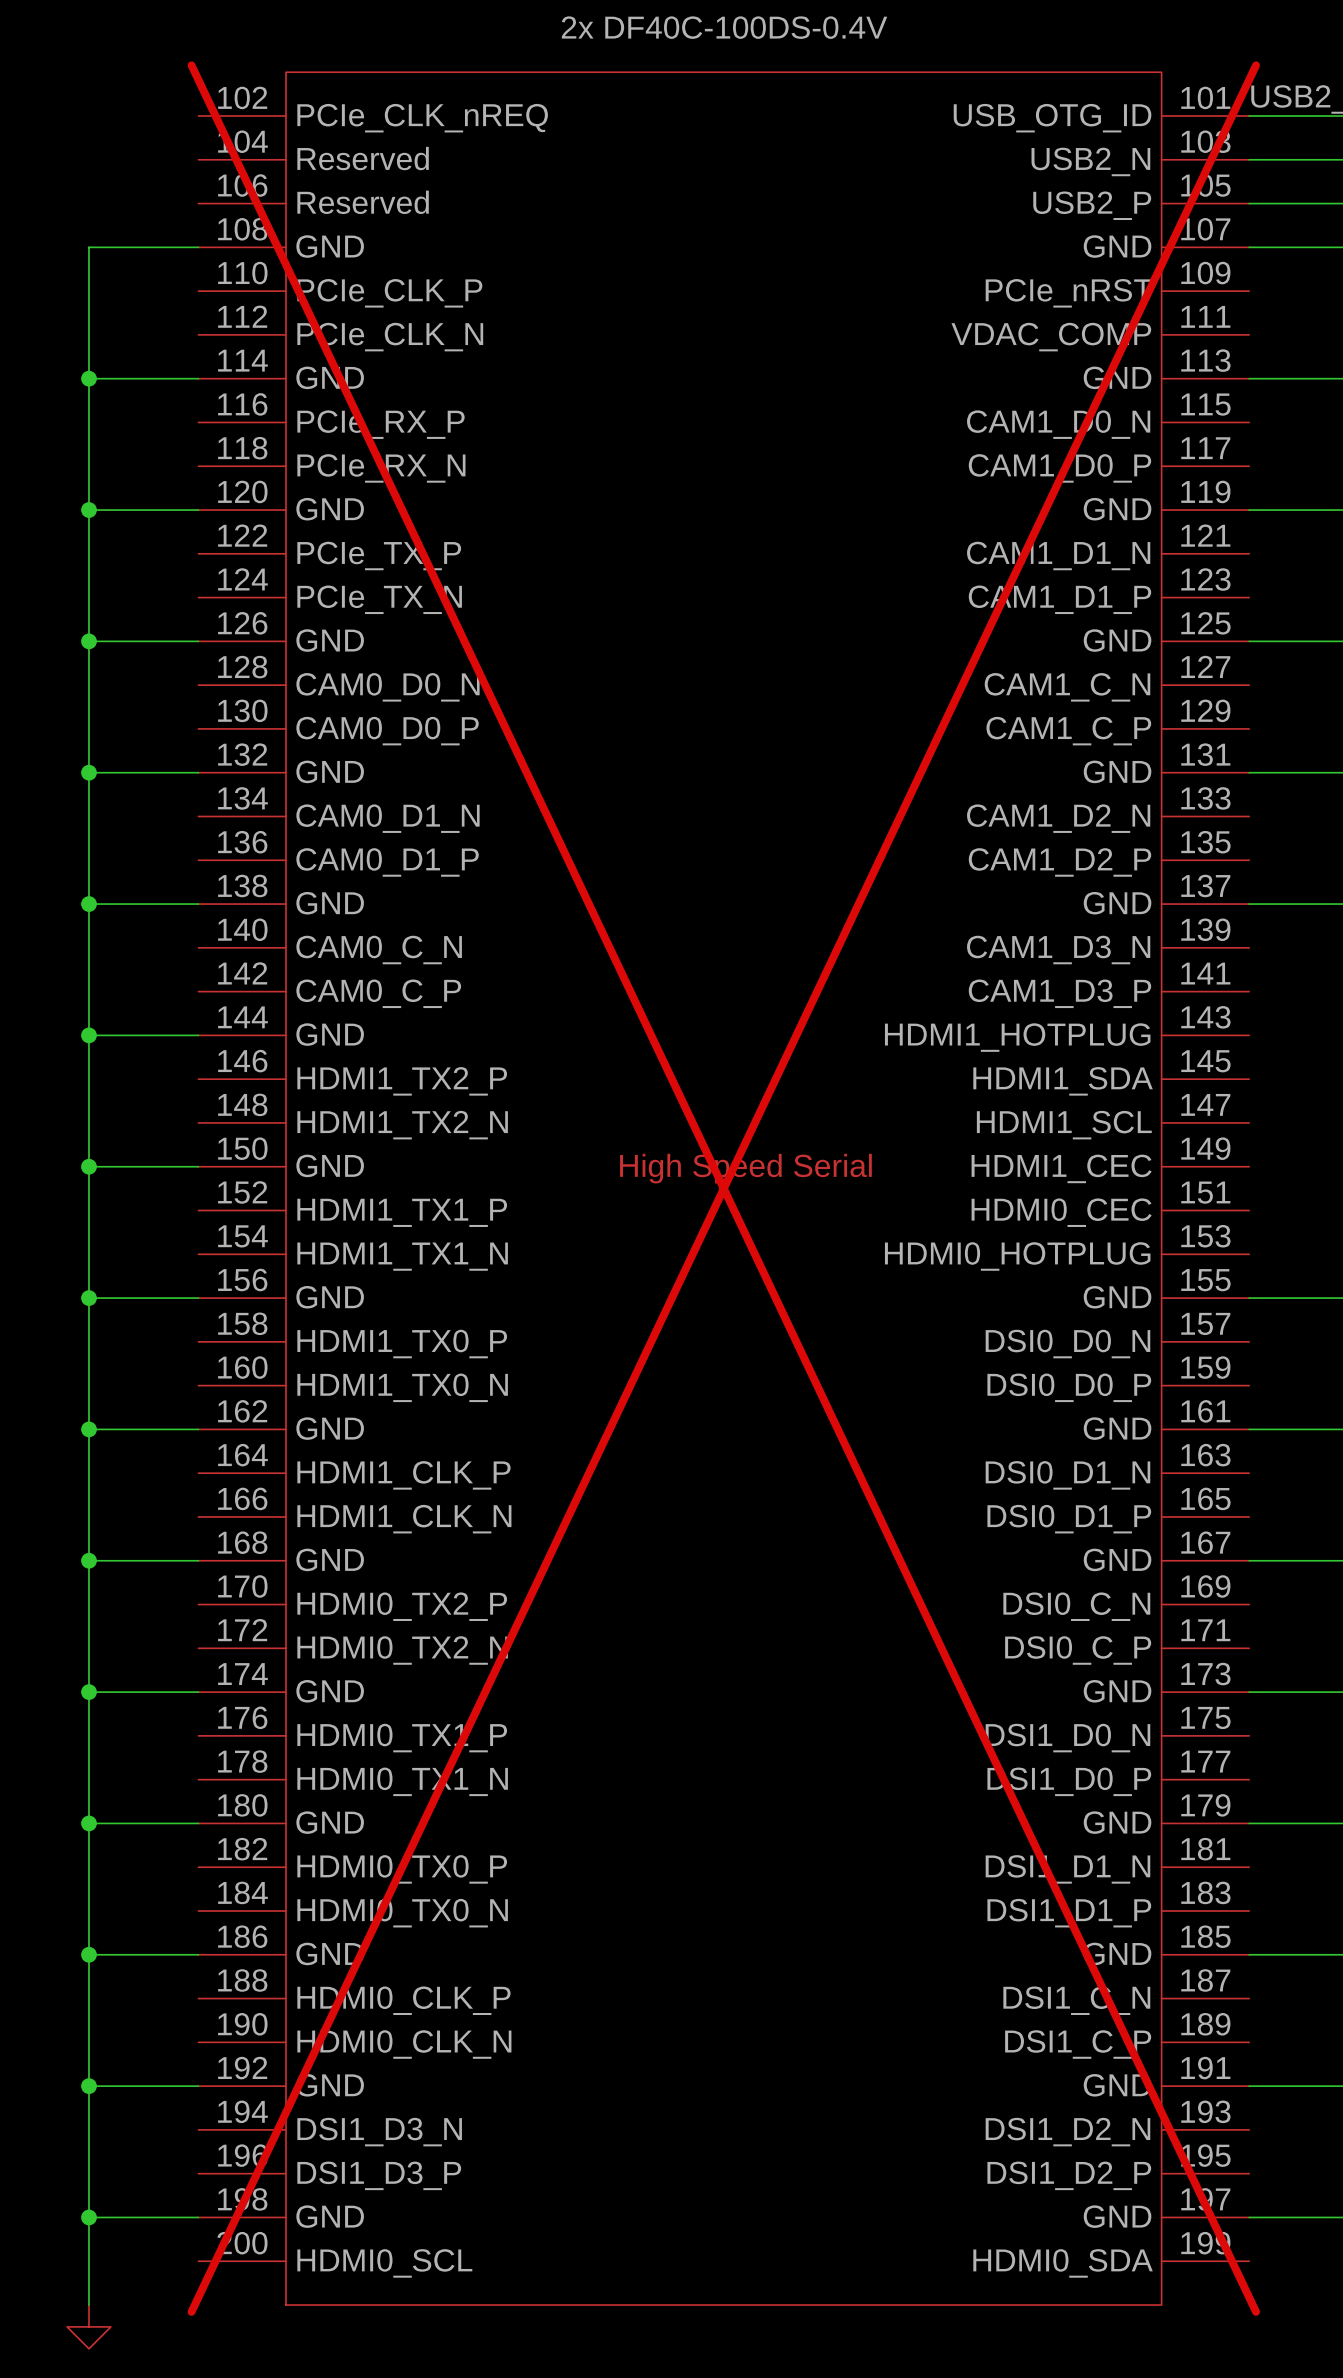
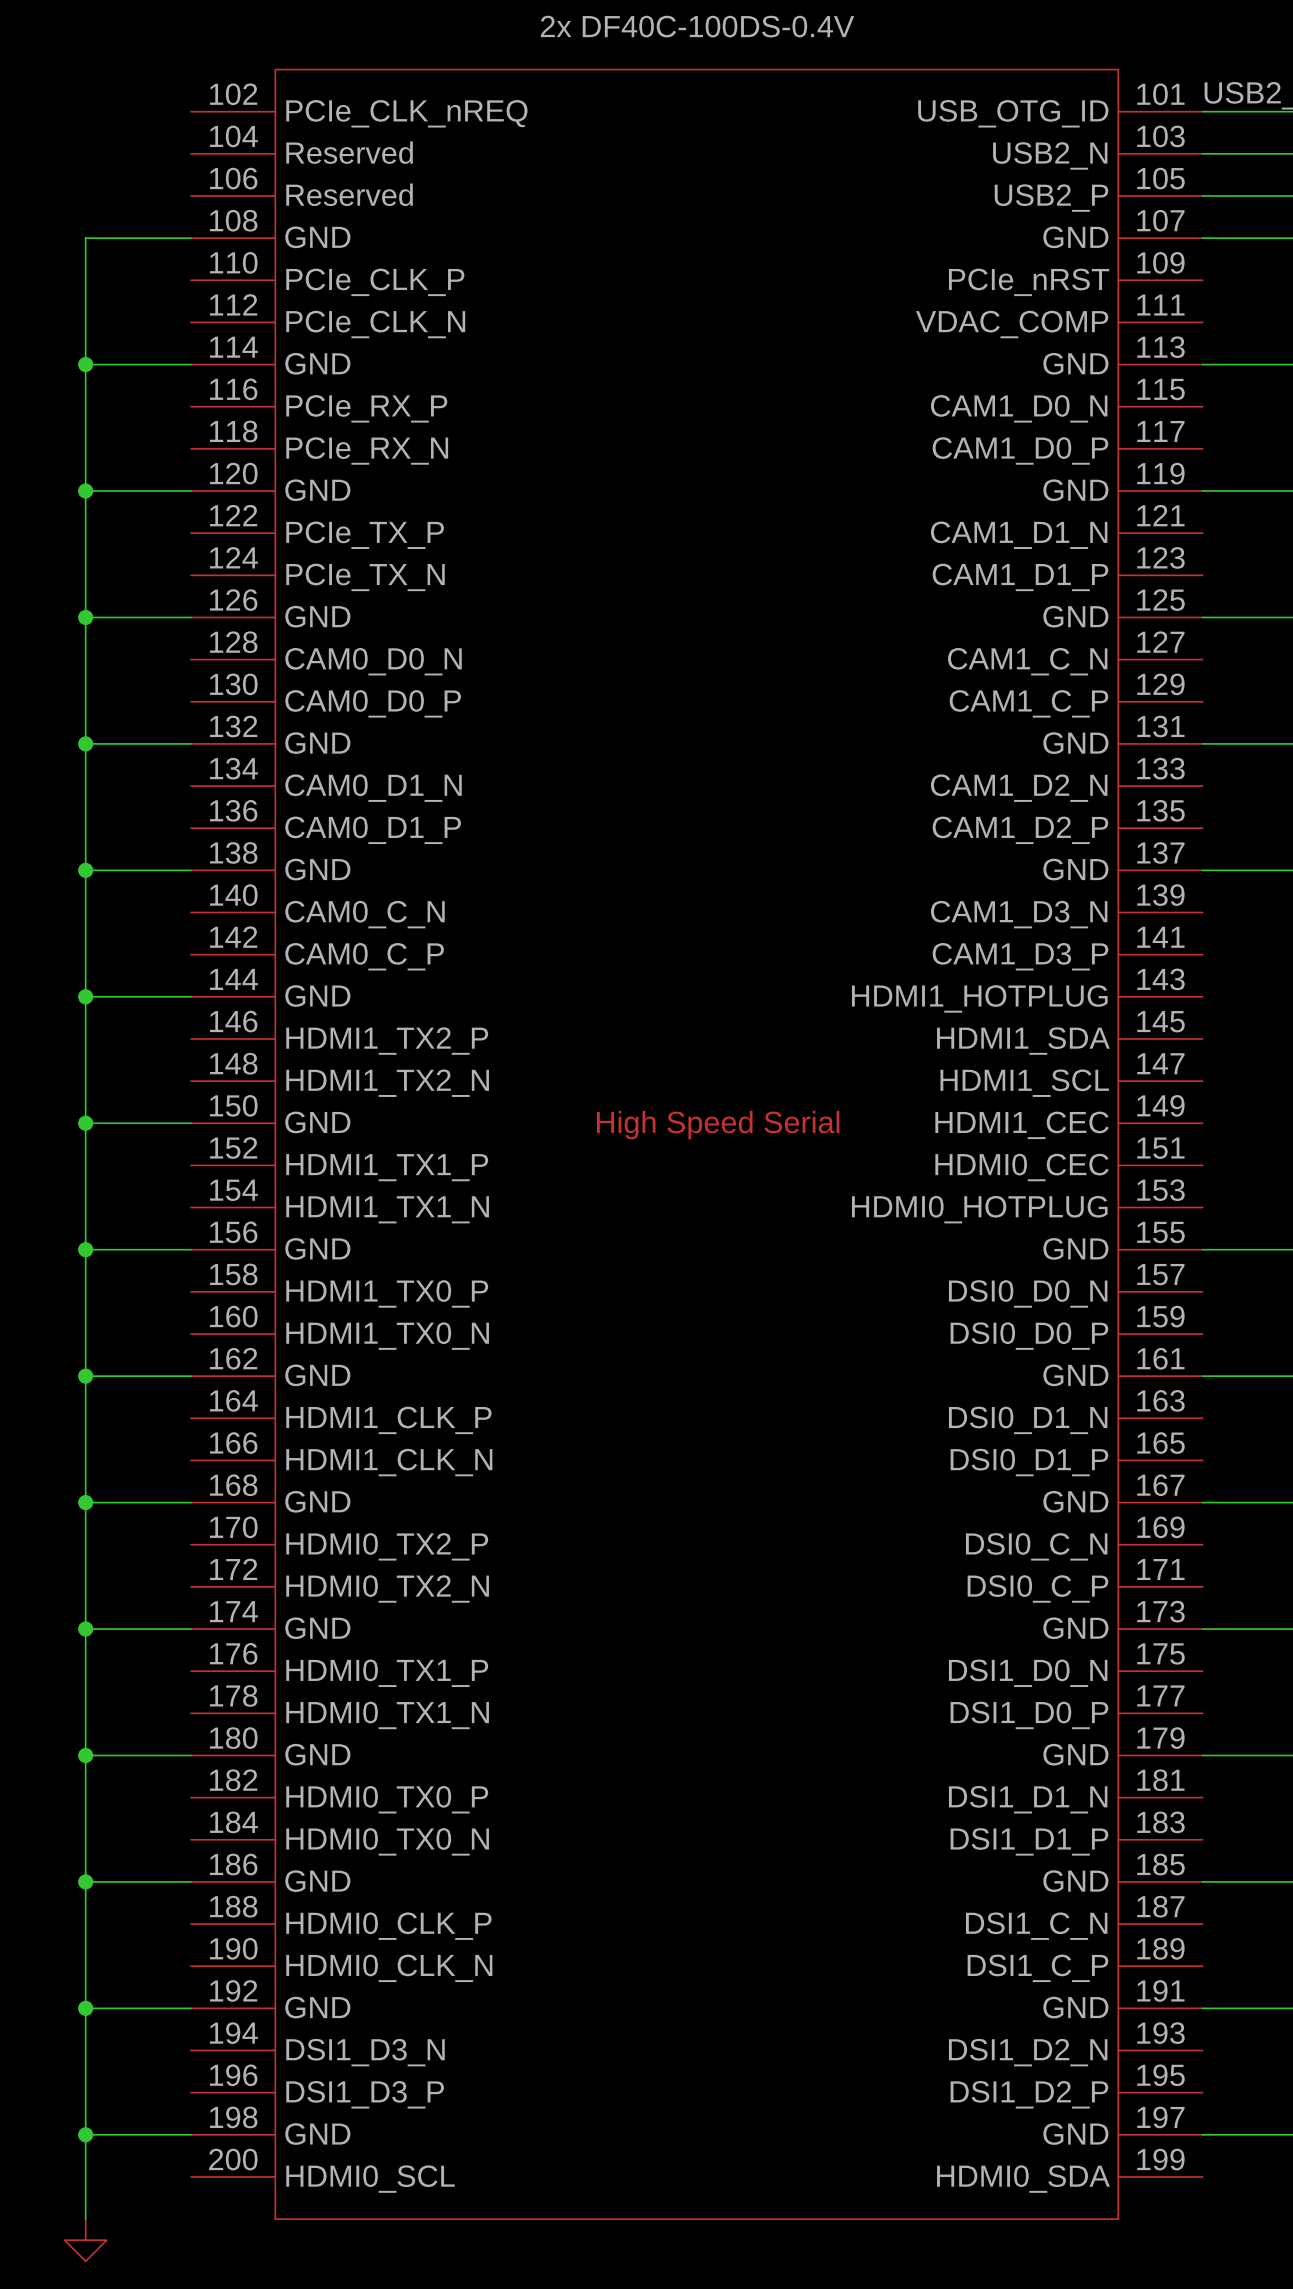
part do-not-place cross: (723, 1188) -> none

